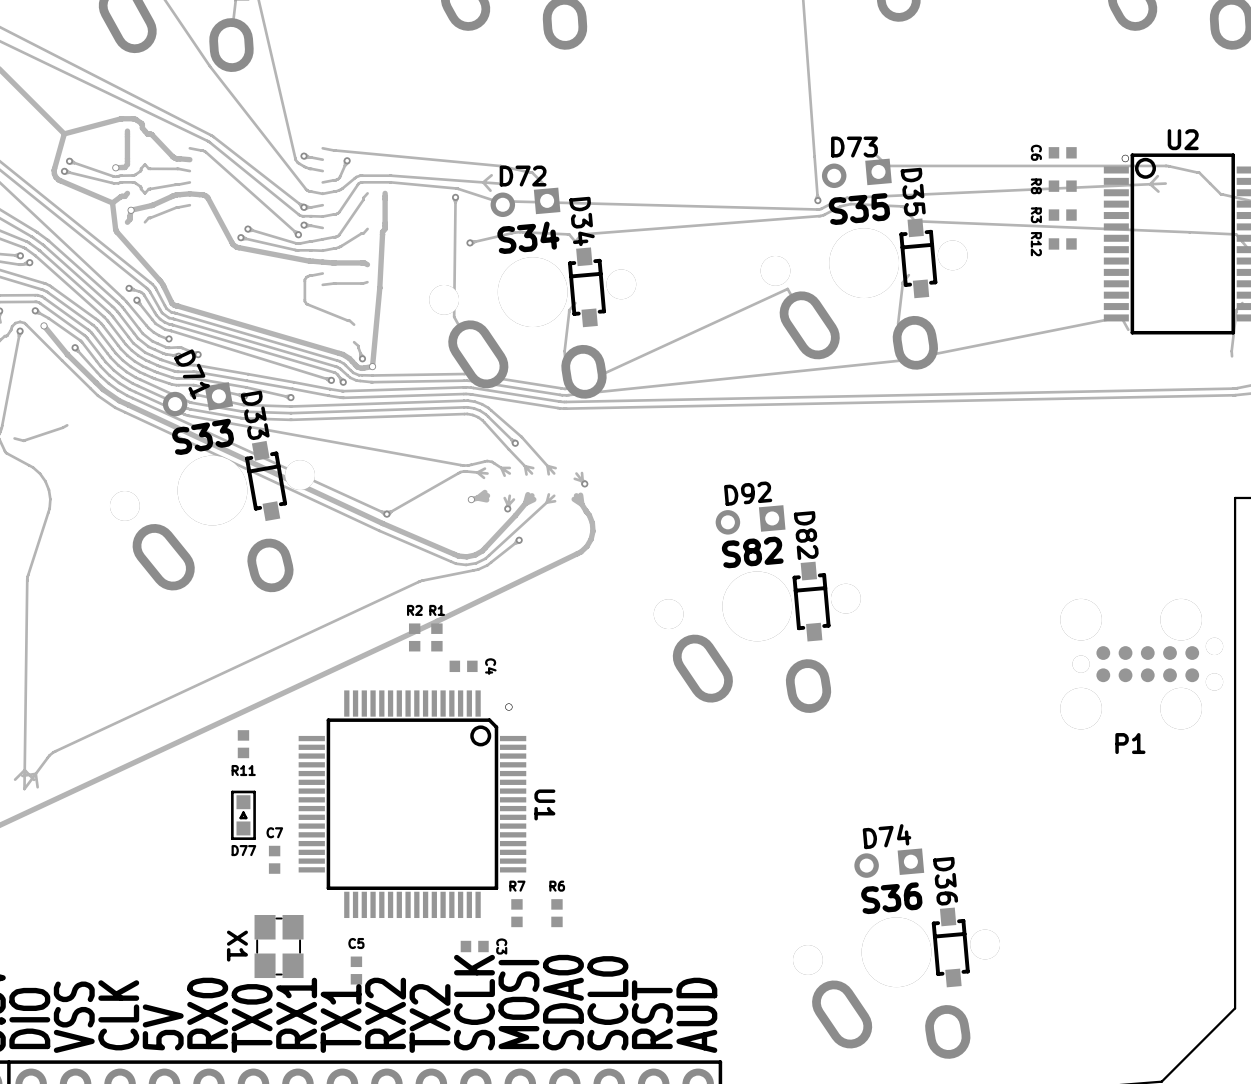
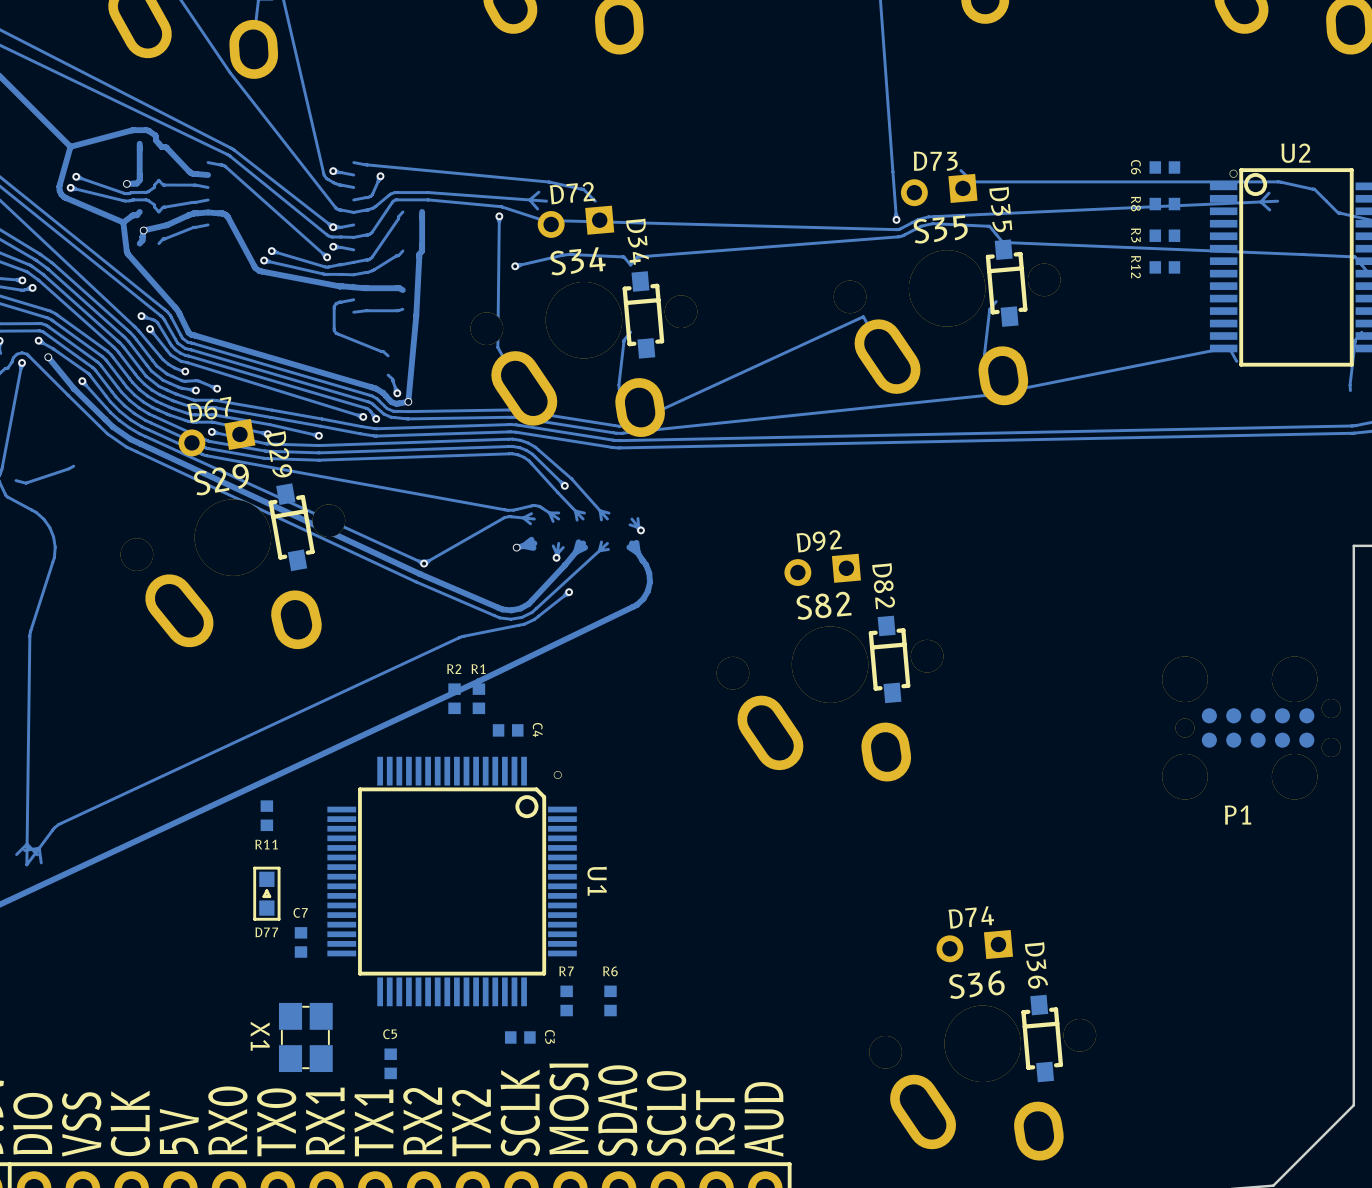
D72 name rotation: 0° (523, 176) -> 5° counterclockwise (572, 193)
D71 name: D71 (192, 374) -> D67 (209, 409)
D33 name: D33 (255, 415) -> D29 (279, 454)
S33 name: S33 (203, 436) -> S29 (221, 479)

